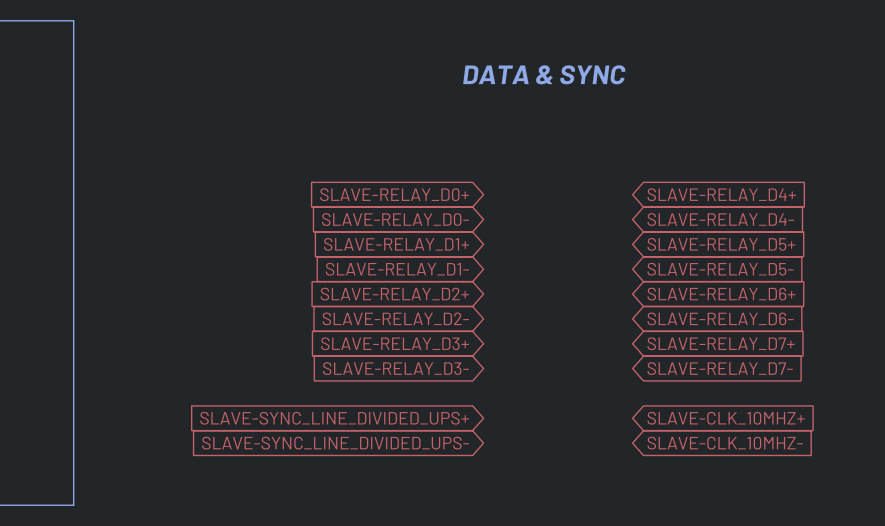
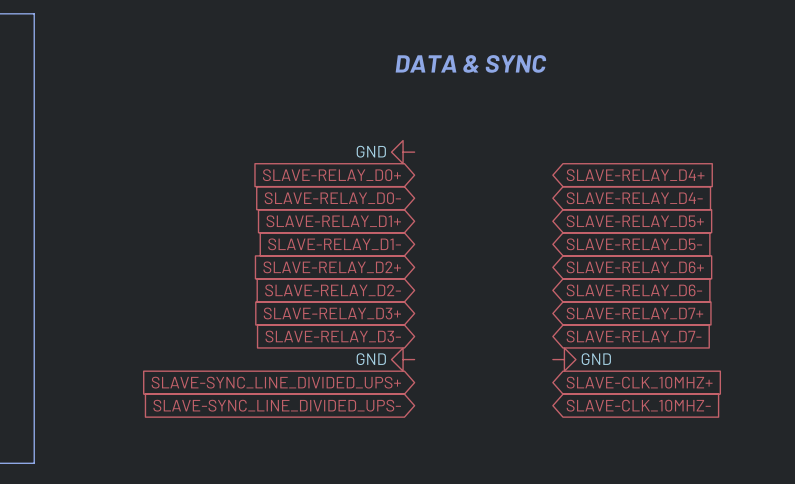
power symbol: none -> GND (403, 152)
power symbol: none -> GND (403, 359)
power symbol: none -> GND (564, 359)

